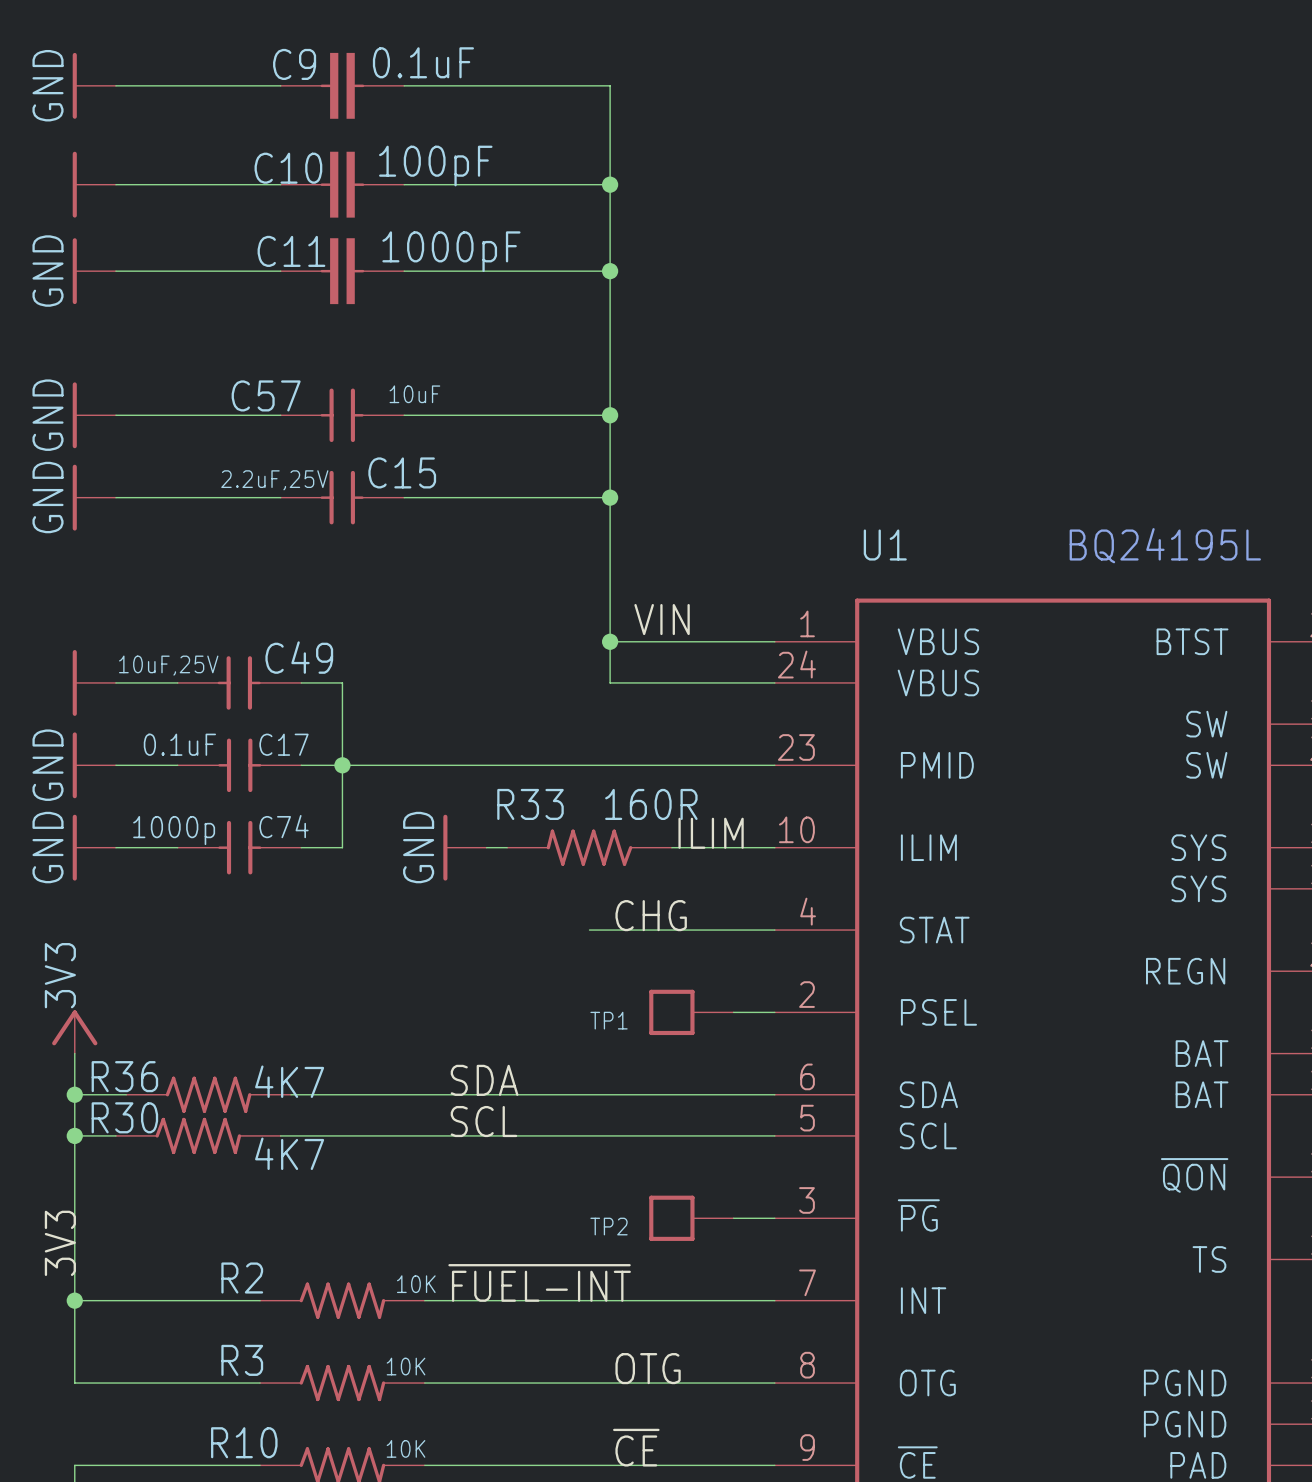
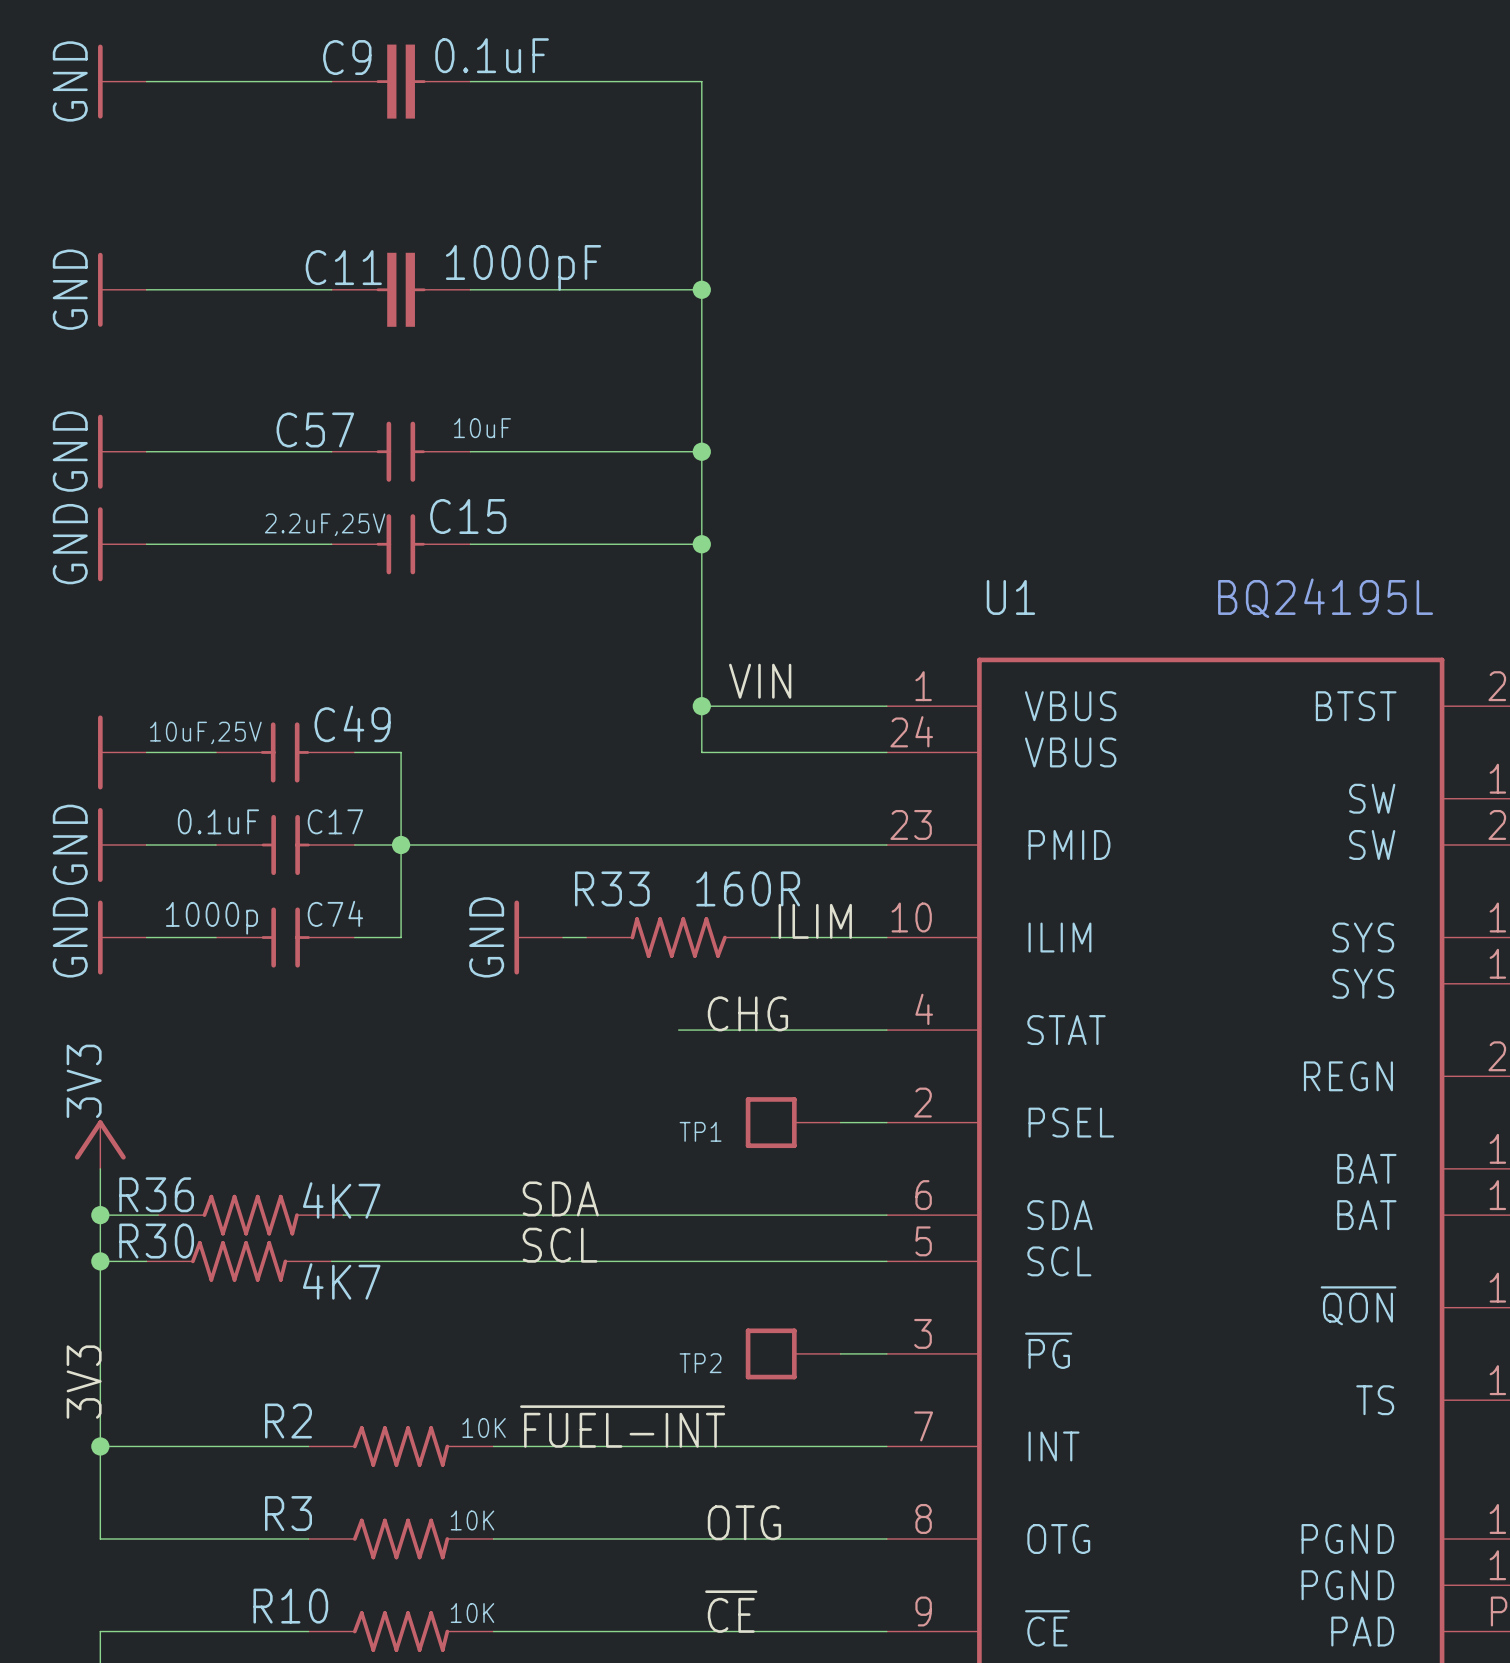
power symbol: (94, 184) -> none
wire: (115, 184) (280, 184) -> none
C10: 100pF (342, 184) -> none
wire: (404, 184) (610, 184) -> none
junction: (610, 184) -> none

